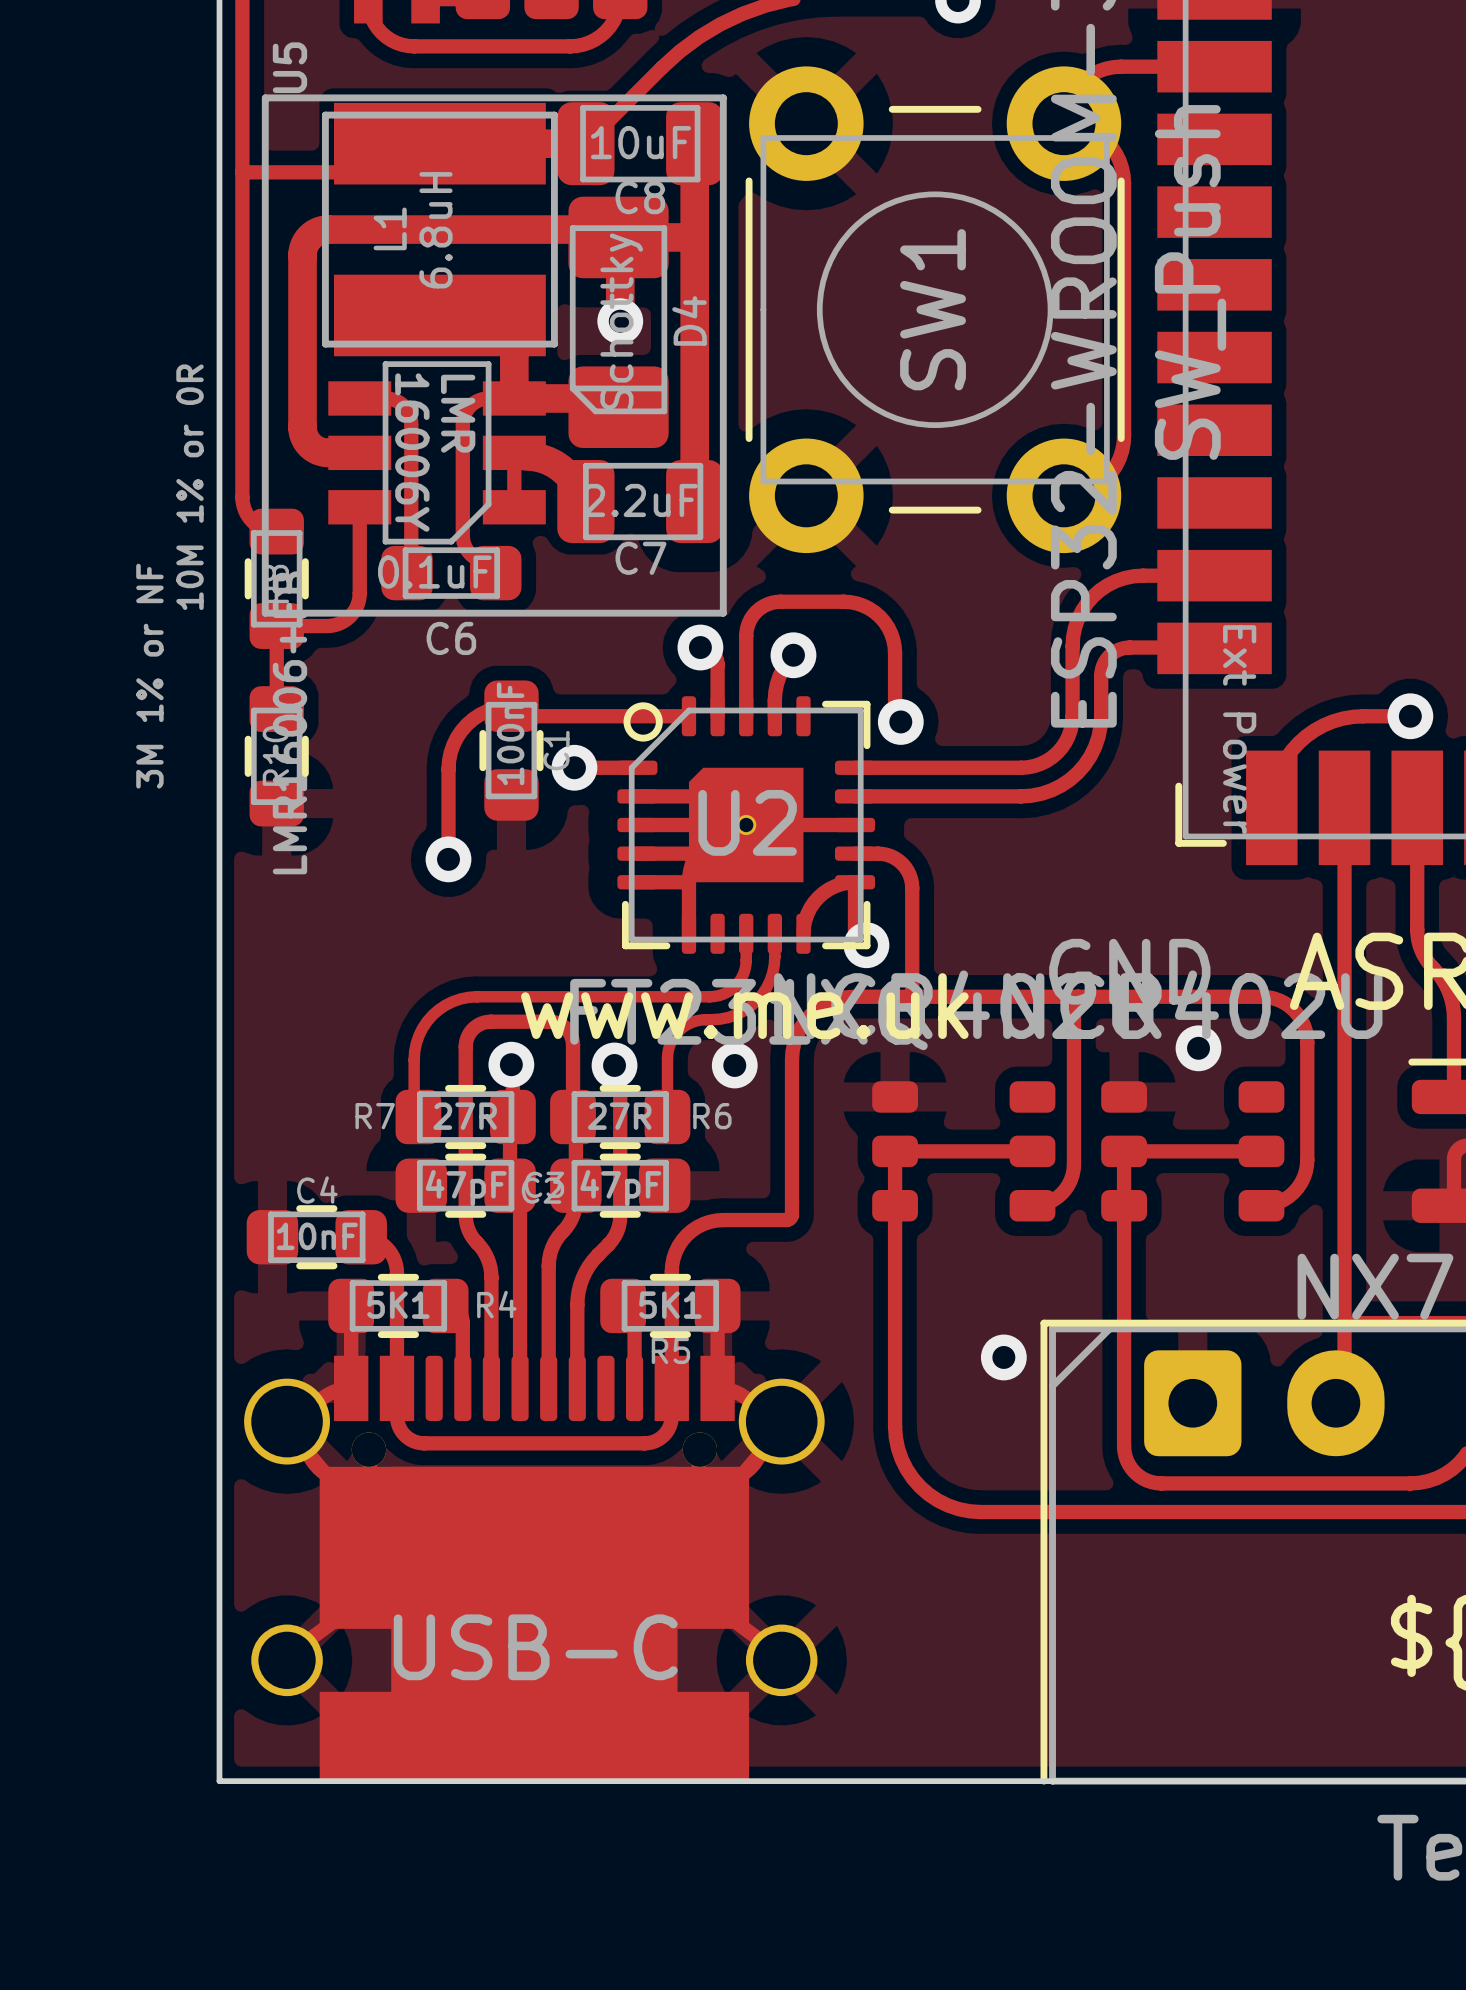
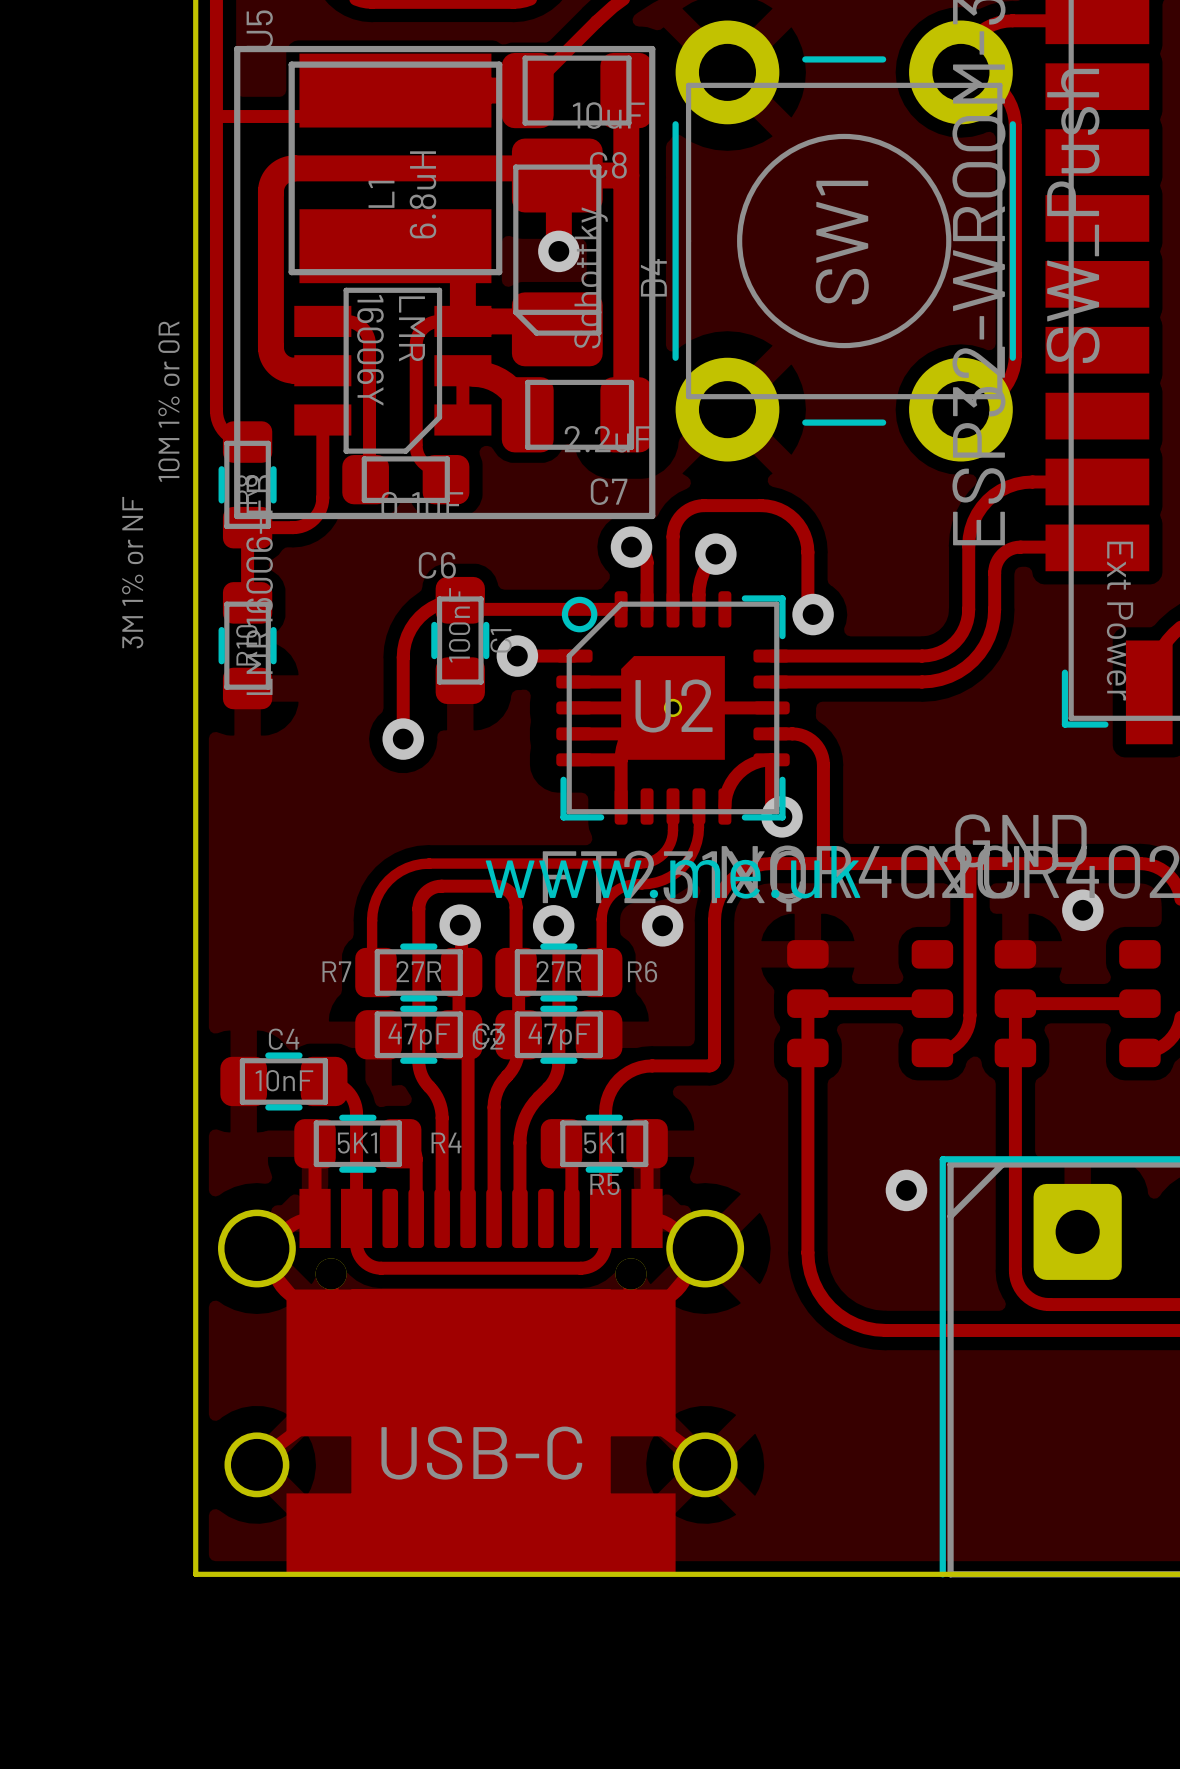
C8 position: (640, 170) -> (608, 140)
L1 position: (413, 230) -> (402, 194)
D4 position: (653, 321) -> (620, 277)
C7 position: (640, 529) -> (608, 465)
C6 position: (434, 605) -> (422, 535)

